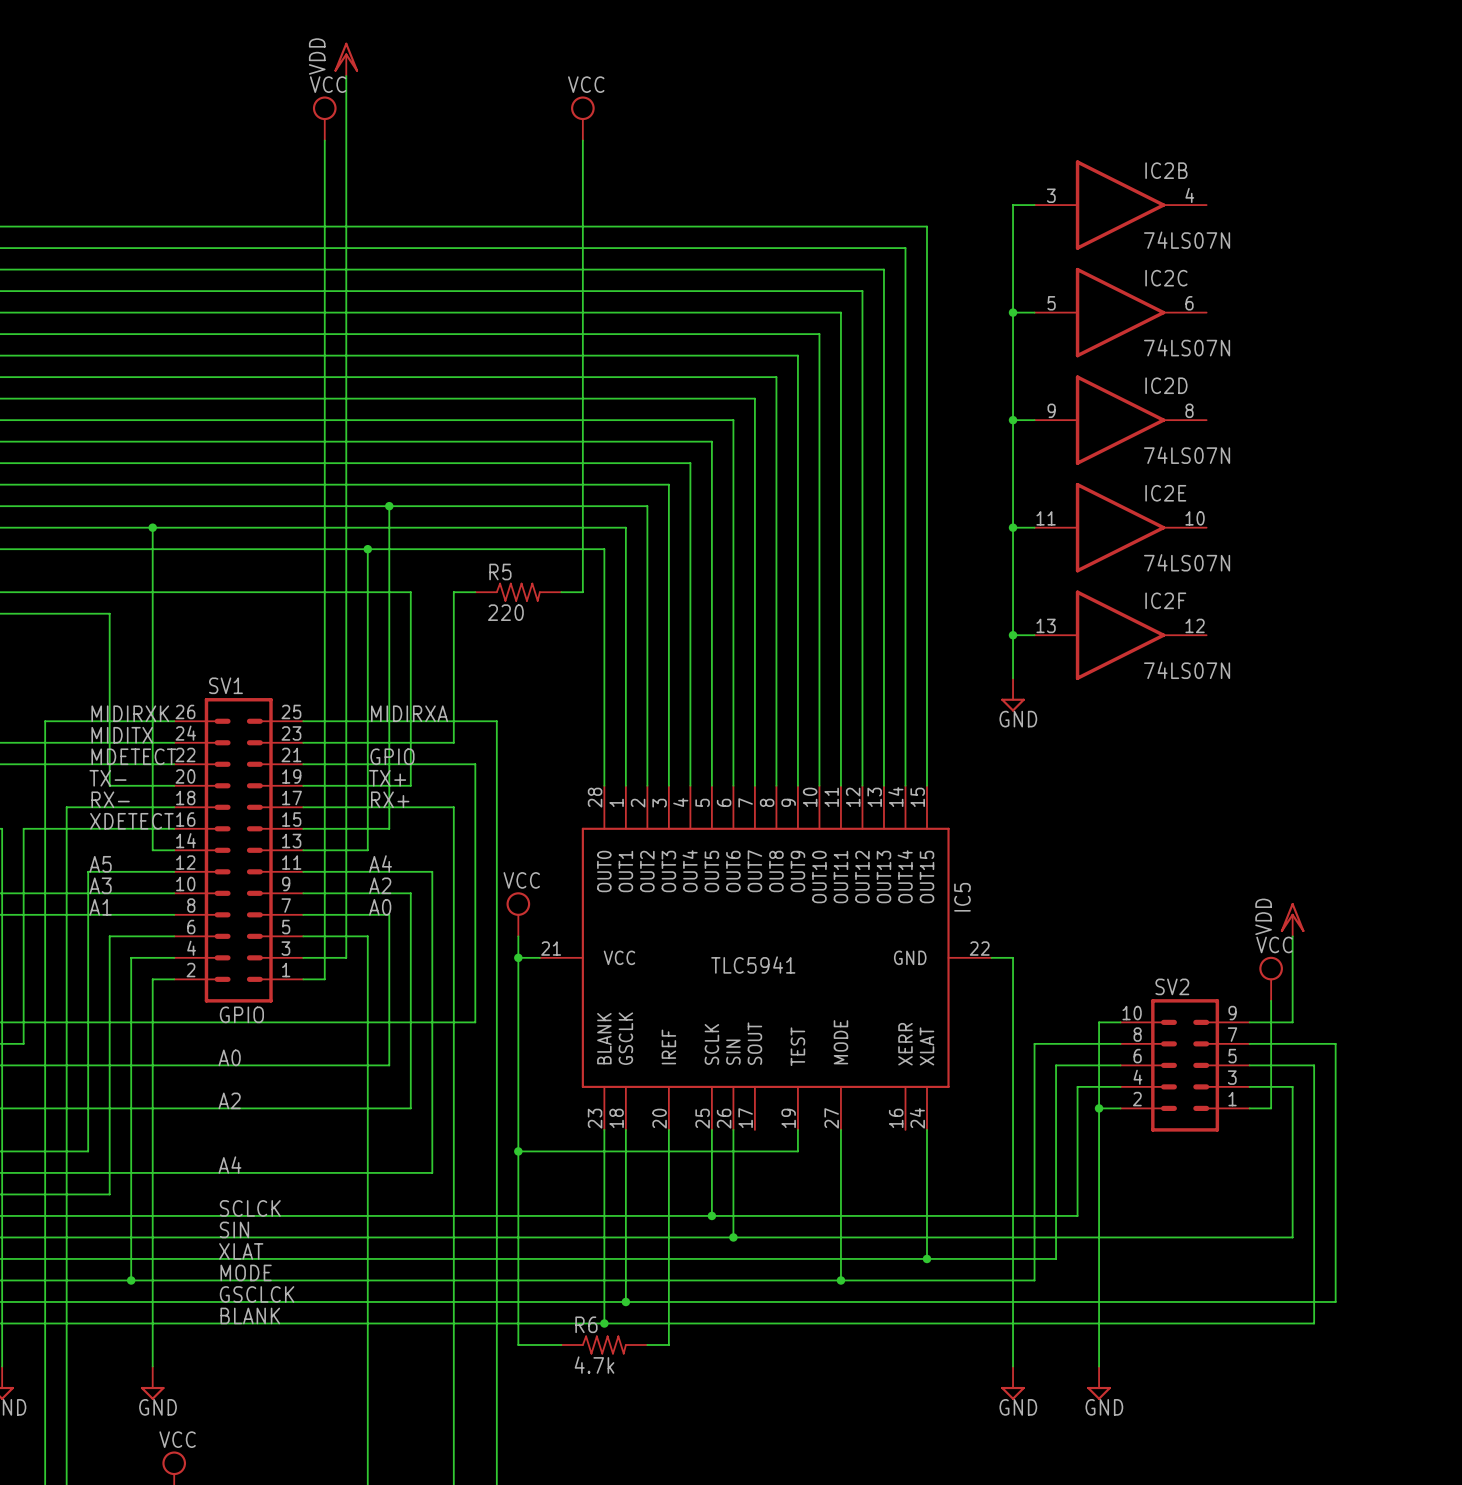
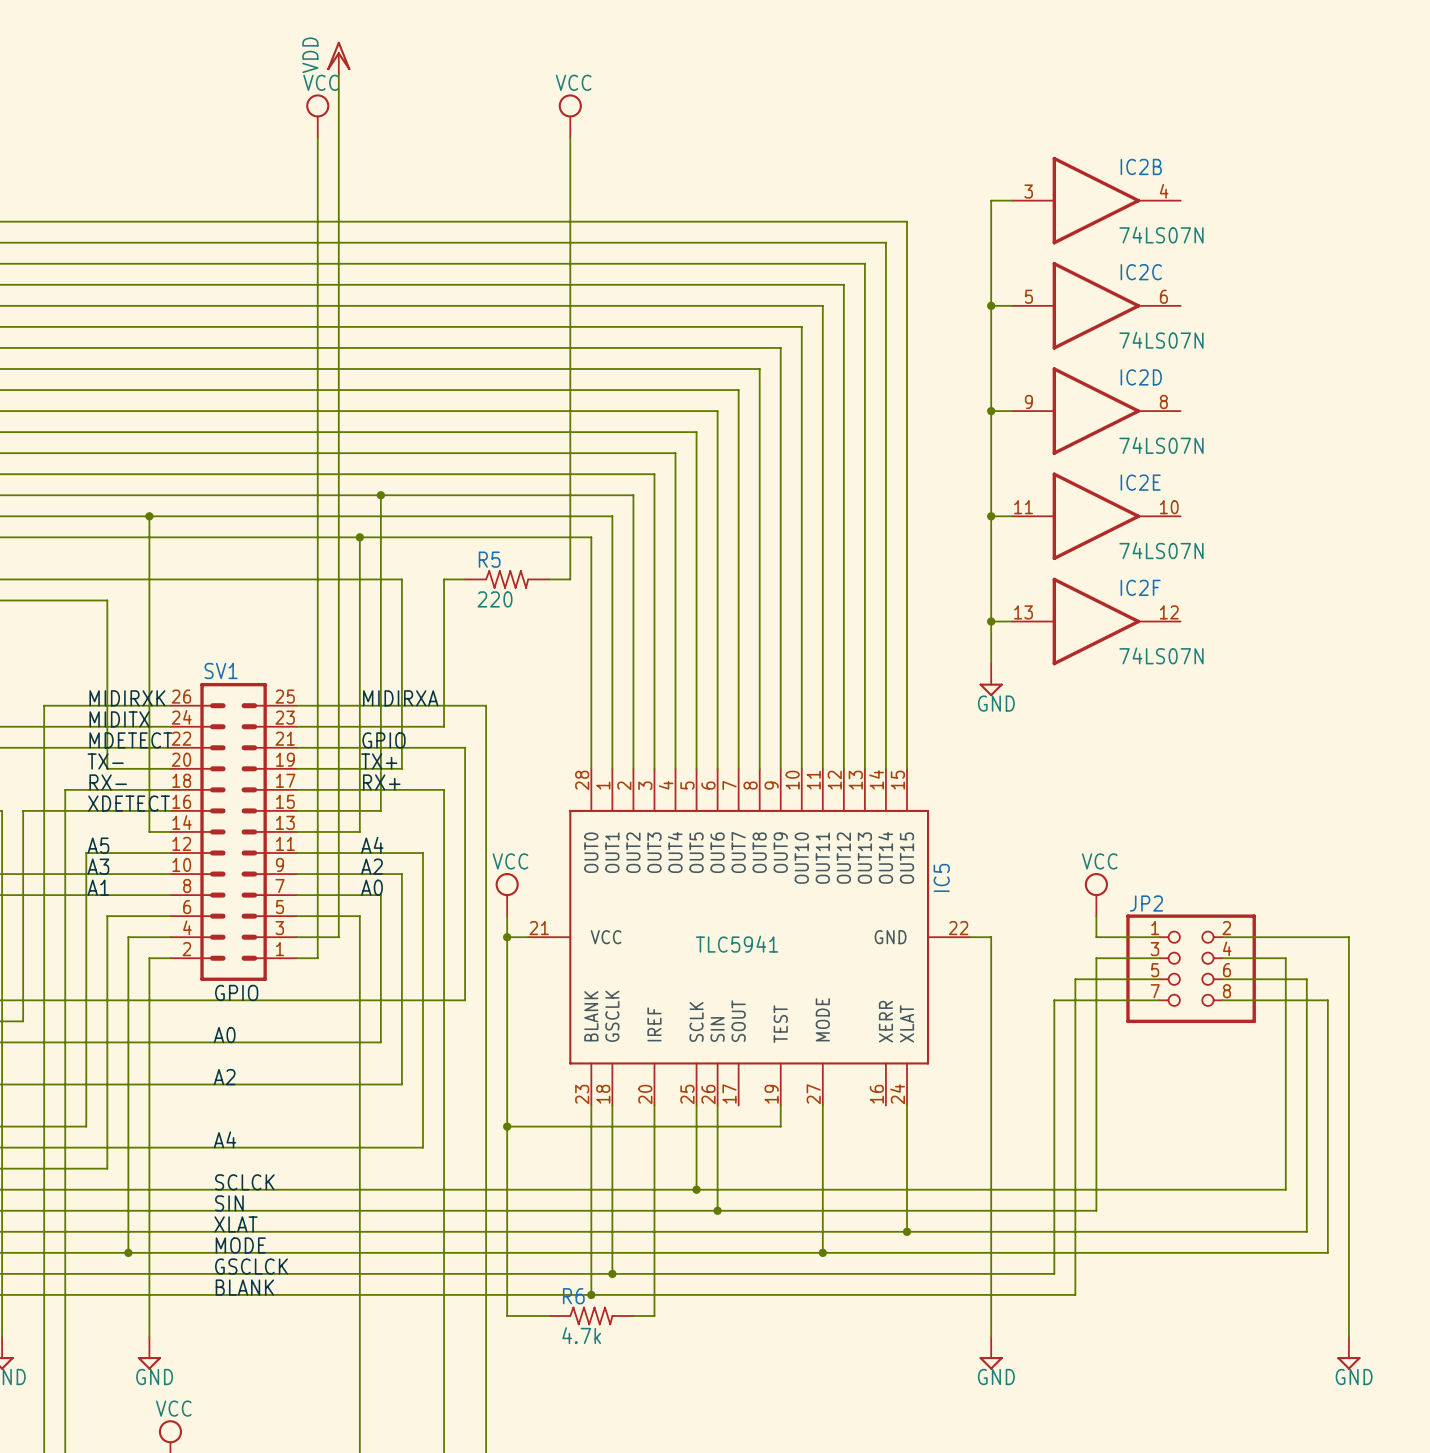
power symbol: VDD (1292, 919) -> none
wire: none -> (1096, 916) (1096, 937) (1159, 937)
wire: (1292, 936) (1292, 1022) -> none
wire: none -> (1222, 937) (1348, 937) (1348, 1337)
power symbol position: VCC (1271, 978) -> VCC (1096, 894)
JP2: none -> (1191, 968)
wire: (1271, 1000) (1271, 1108) (1249, 1108) -> none
wire: (1120, 1043) (1034, 1043) (1034, 1280) -> (1264, 1000) (1327, 1000) (1327, 1252) (1012, 1252)
wire: (1249, 1043) (1335, 1043) -> (1222, 979) (1306, 979) (1306, 1021)
wire: (1120, 1065) (1056, 1065) (1056, 1258) -> (1306, 1231) (1033, 1231)
SV2: (1185, 1065) -> none
wire: (1249, 1065) (1314, 1065) -> (1222, 958) (1285, 958) (1285, 1042)
wire: (1077, 1086) (1120, 1086) -> (1054, 1063) (1054, 1000) (1075, 1000) (1075, 979) (1159, 979)
wire: (1249, 1086) (1292, 1086) (1292, 1237) (1120, 1237) -> (1159, 958) (1096, 958) (1096, 1210)
wire: (1099, 1108) (1120, 1108) -> none
junction: (1099, 1108) -> none
wire: (1314, 1215) (1314, 1323) (1099, 1323) (1099, 1366) -> none
wire: (1335, 1258) (1335, 1301) (1077, 1301) -> (1285, 1189) (1054, 1189) (1054, 1273)
power symbol: GND (1099, 1383) -> none
power symbol: none -> GND (1348, 1353)

